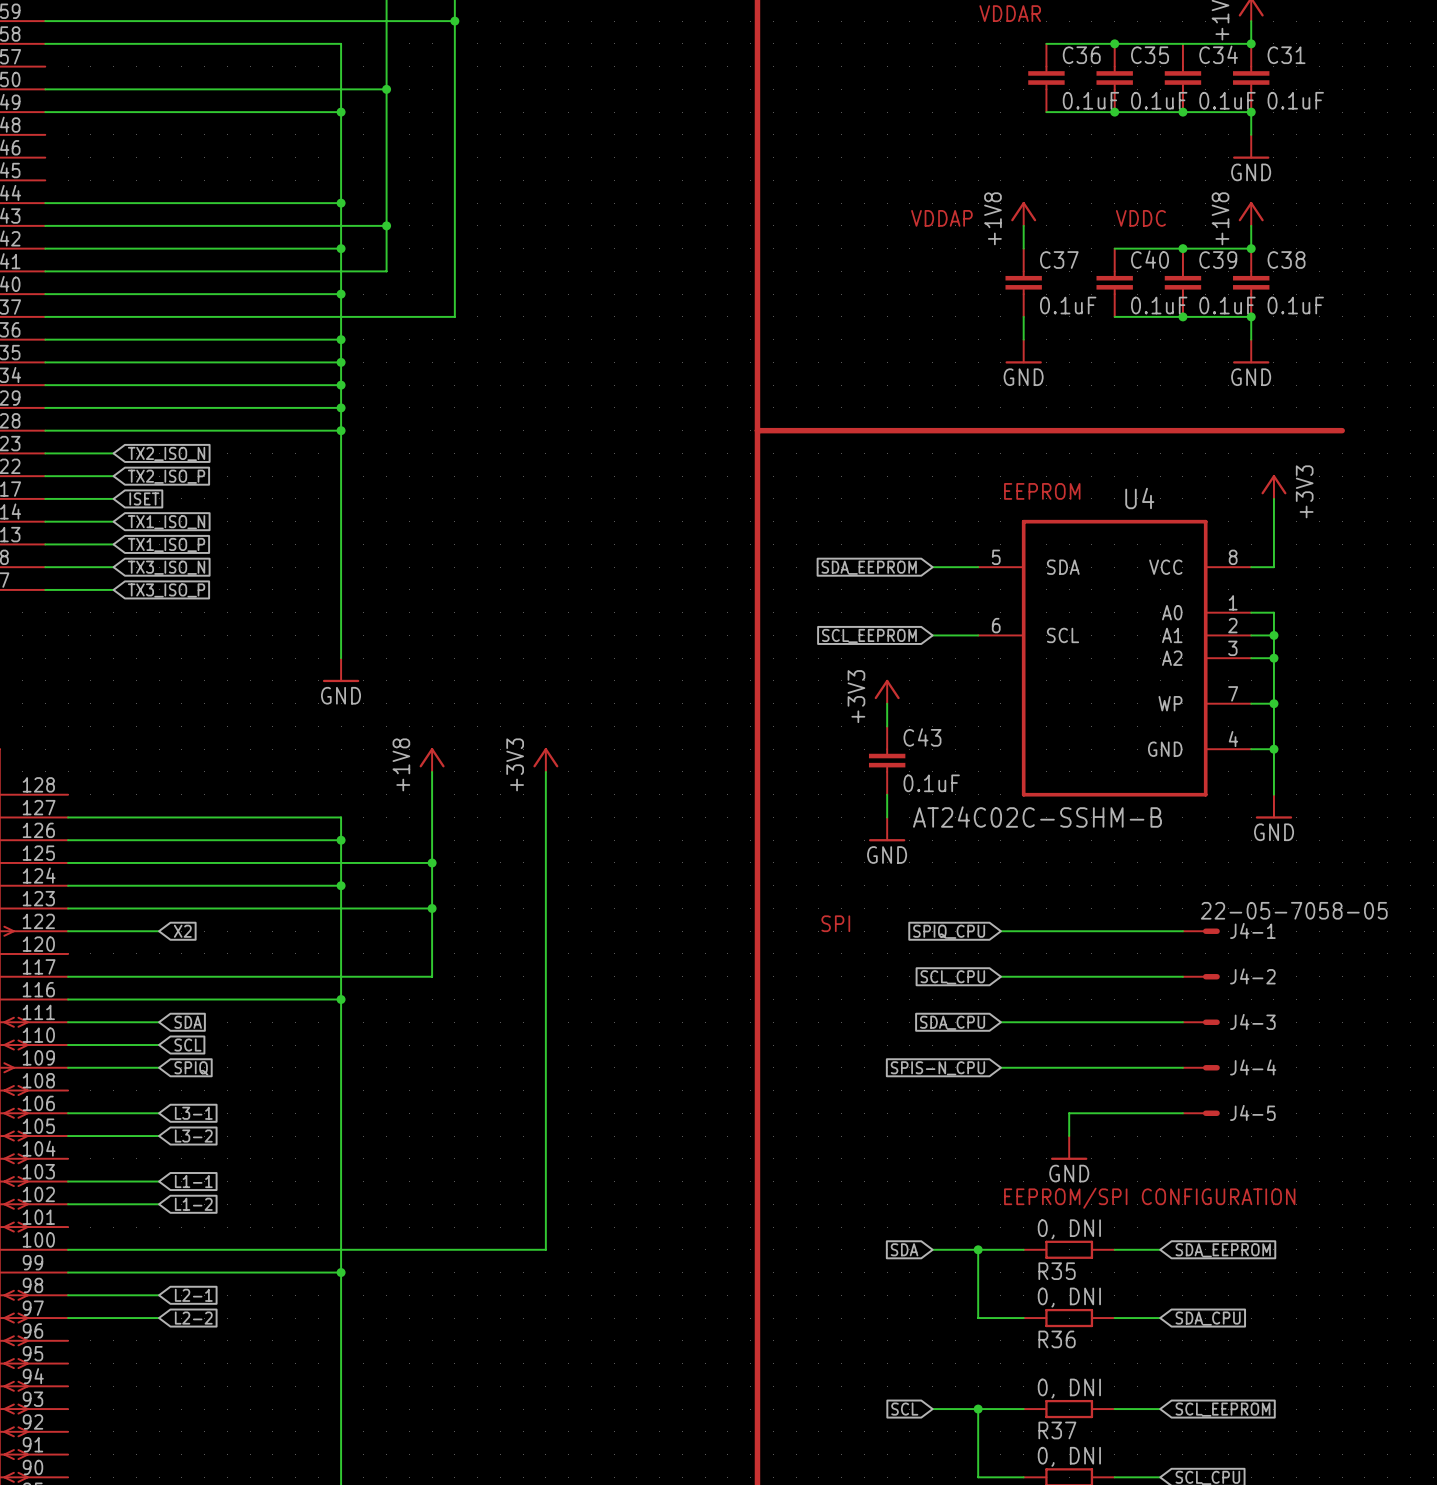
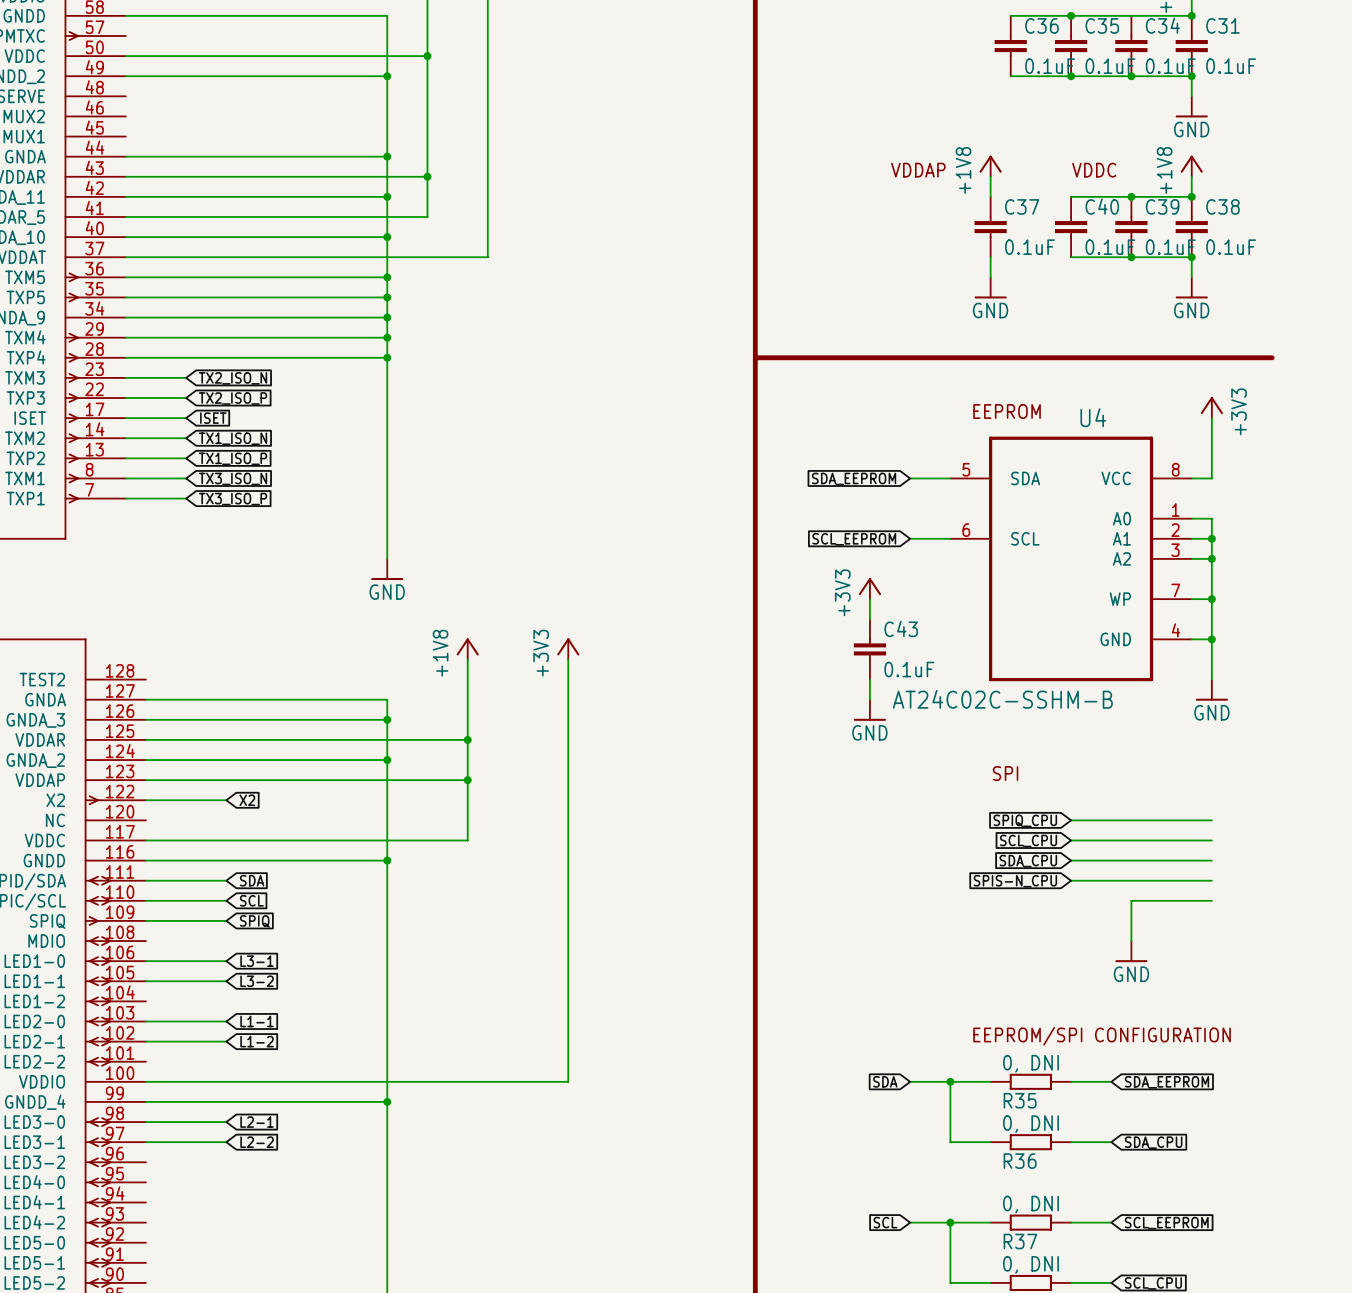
text position: SPI (835, 923) -> SPI (1005, 773)
global label position: SPIQ_CPU (949, 931) -> SPIQ_CPU (1025, 820)
wire: (1000, 931) (1182, 931) -> none
J4-1: 22-05-7058-05 (1201, 931) -> none
wire: none -> (1071, 820) (1211, 820)
wire: (1000, 976) (1114, 976) -> none
wire: none -> (1131, 840) (1211, 840)
J4-2: (1201, 976) -> none
global label position: SCL_CPU (952, 977) -> SCL_CPU (1028, 840)
wire: none -> (1071, 860) (1211, 860)
global label position: SDA_CPU (952, 1022) -> SDA_CPU (1028, 861)
wire: (1000, 1022) (1114, 1022) -> none
wire: none -> (1131, 880) (1211, 880)
J4-3: (1201, 1022) -> none
wire: none -> (1211, 900) (1131, 900) (1131, 941)
wire: (1000, 1067) (1182, 1067) -> none
J4-4: (1201, 1067) -> none
global label position: SPIS-N_CPU (937, 1068) -> SPIS-N_CPU (1015, 881)
wire: (1182, 1113) (1069, 1113) (1069, 1136) -> none
J4-5: (1201, 1113) -> none
power symbol position: GND (1069, 1147) -> GND (1131, 951)

